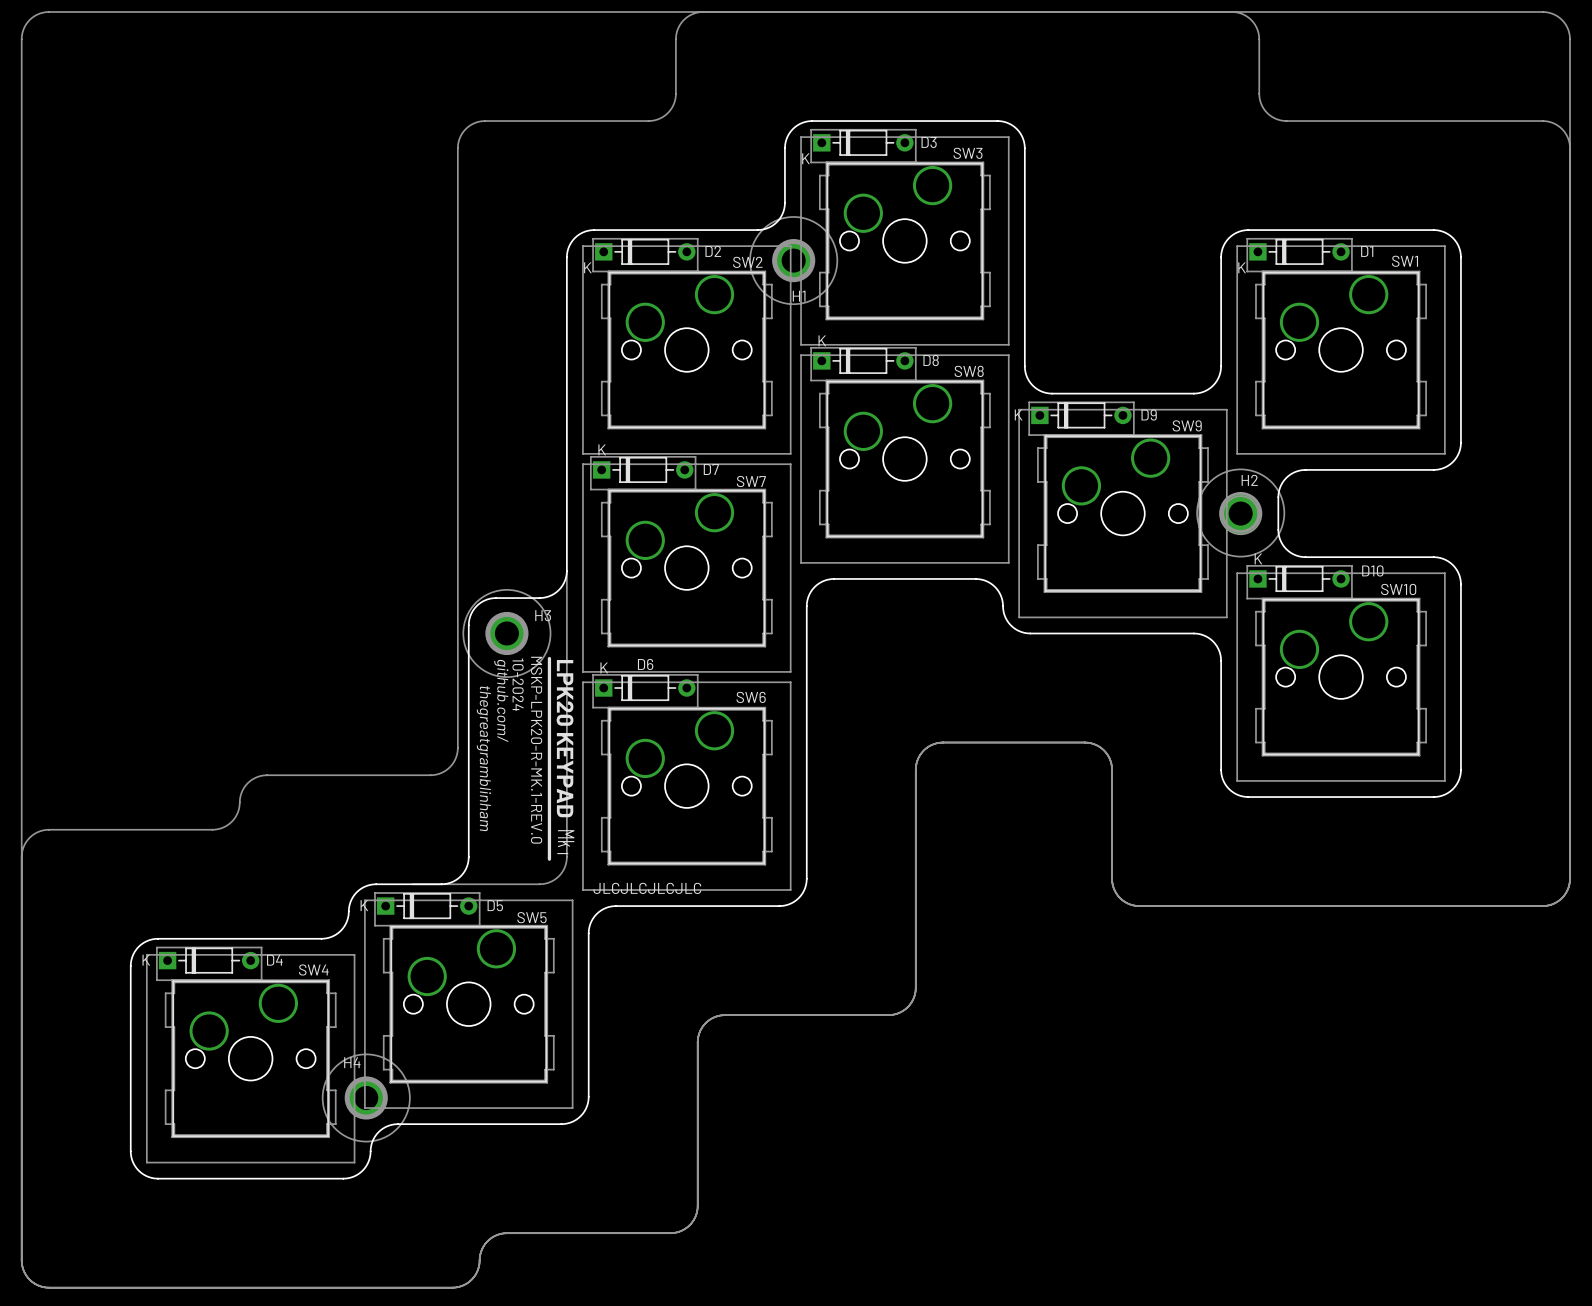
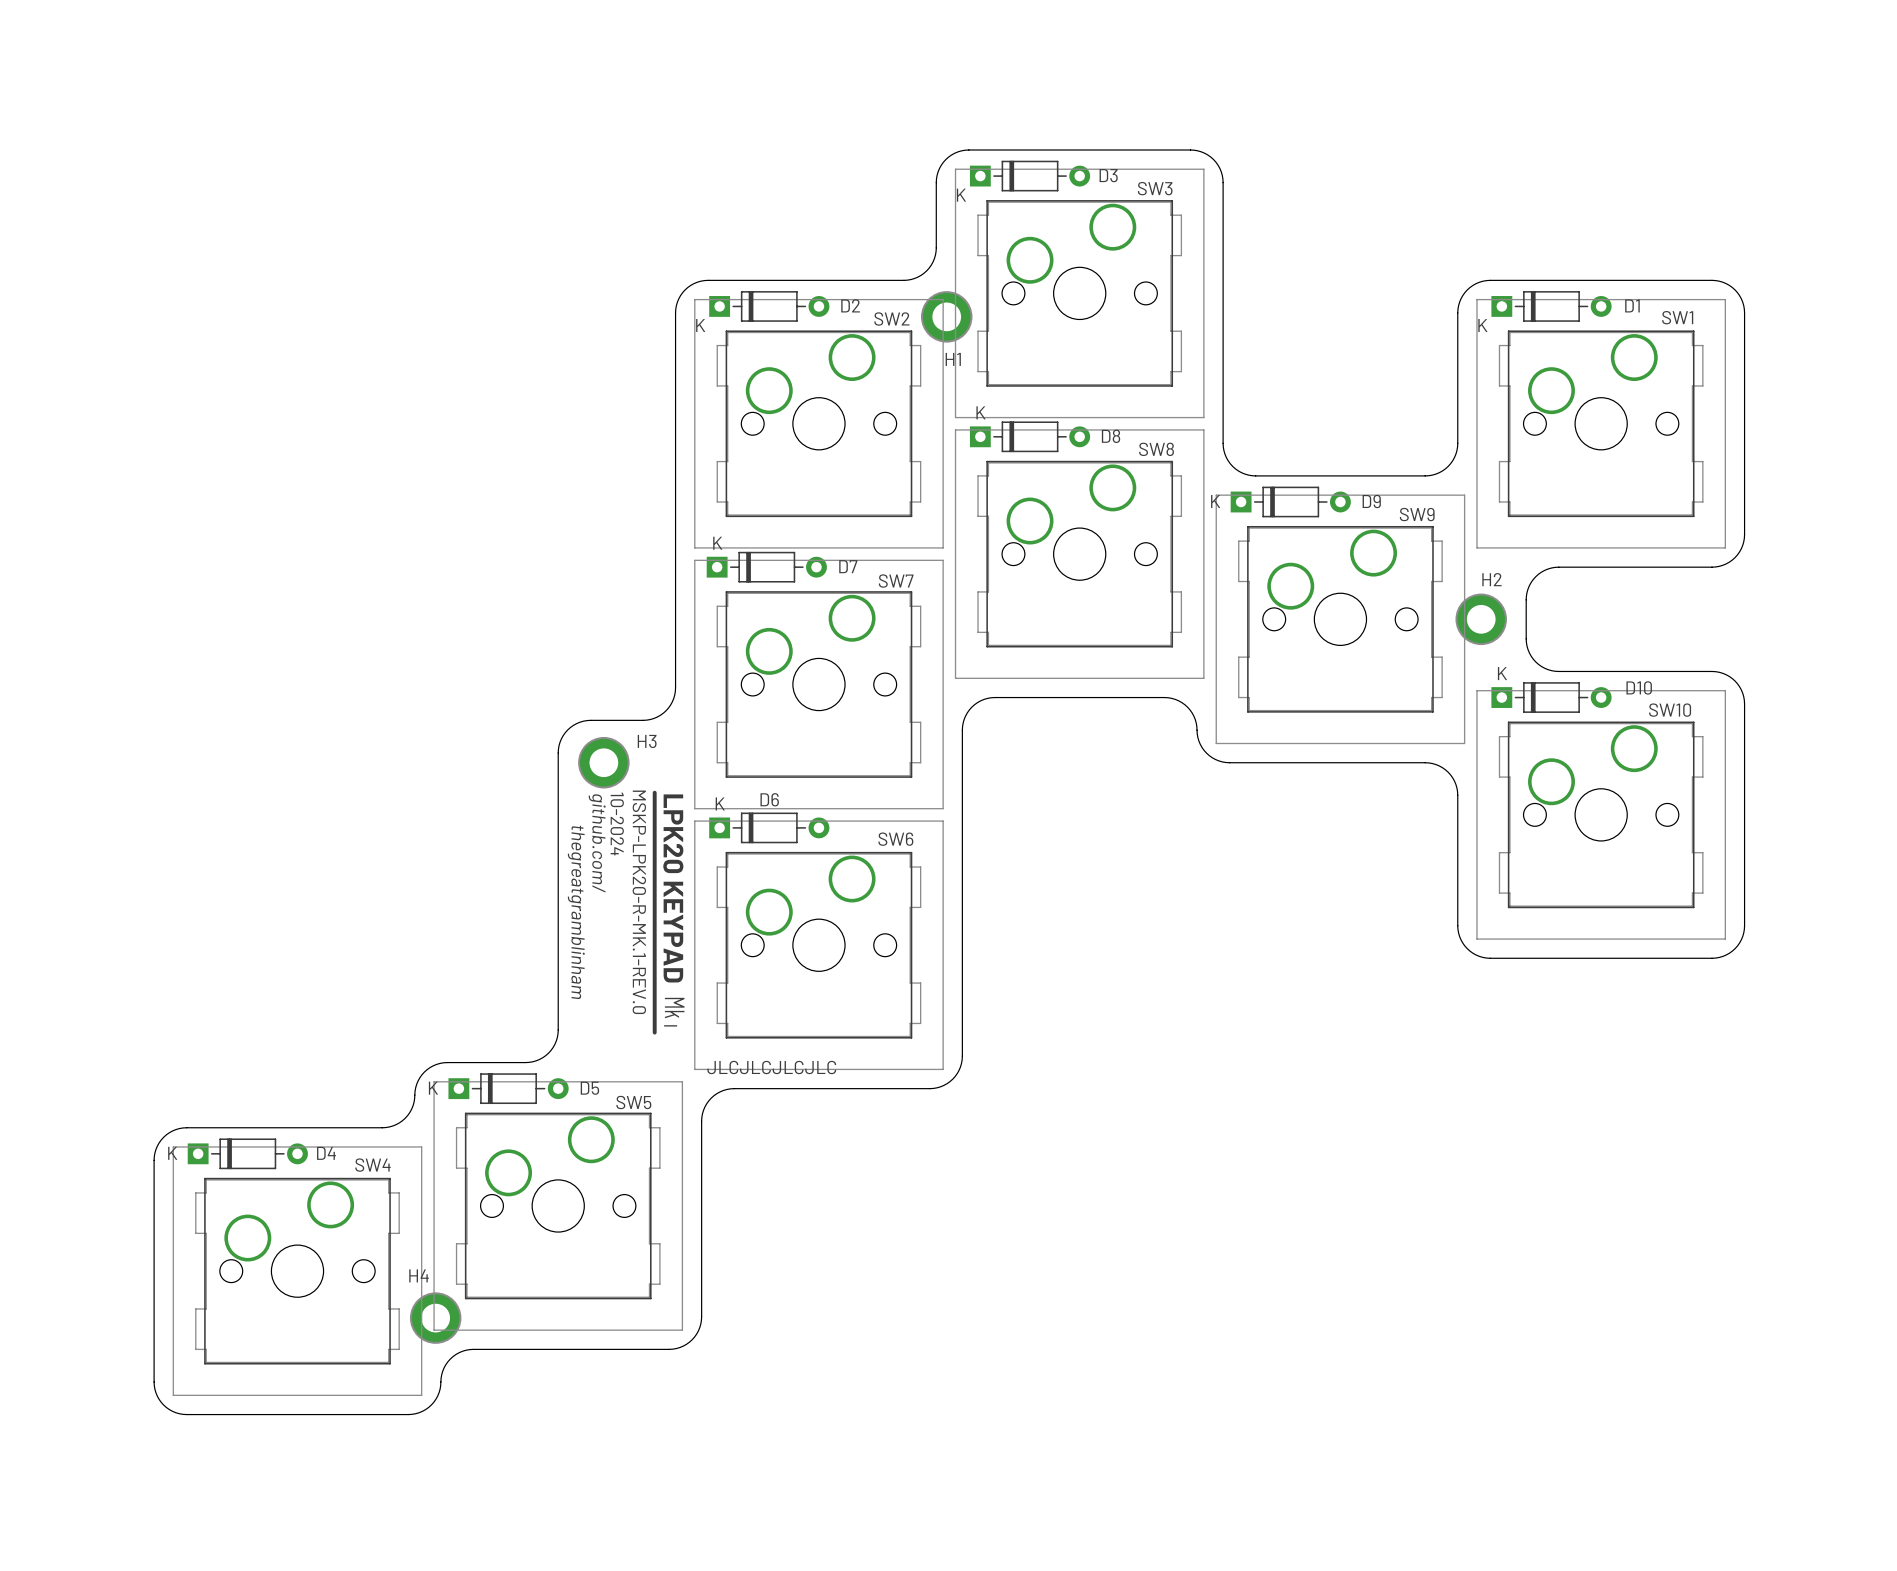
line: (703, 11) (694, 13) (686, 17) (677, 30) (675, 99) (669, 110) (660, 118) (648, 121) (482, 121) (468, 126) (459, 139) (457, 148) (457, 747) (456, 756) (451, 764) (445, 771) (433, 775) (260, 775) (252, 779) (245, 785) (241, 793) (235, 816) (229, 823) (221, 828) (45, 829) (37, 832) (29, 837) (23, 848) (21, 857) -> none
line: (1231, 11) (1246, 16) (1256, 27) (1259, 39) (1259, 99) (1267, 113) (1277, 119) (1545, 121) (1554, 123) (1562, 129) (1568, 139) (1570, 148) -> none
line: (826, 162) (826, 319) (983, 319) (983, 162) (811, 162) (811, 129) (915, 129) (915, 162) -> none
drawing: [749, 216, 838, 305] -> none
line: (608, 271) (608, 428) (765, 428) (765, 271) (593, 271) (593, 238) (697, 238) (697, 271) -> none
line: (1262, 271) (1262, 428) (1419, 428) (1419, 271) (1247, 271) (1247, 238) (1351, 238) (1351, 271) -> none
line: (826, 380) (826, 537) (983, 537) (983, 380) (811, 380) (811, 347) (915, 347) (915, 380) -> none
line: (1044, 435) (1044, 592) (1201, 592) (1201, 435) (1029, 435) (1029, 402) (1133, 402) (1133, 435) -> none
drawing: [1196, 468, 1285, 558] -> none
line: (608, 489) (608, 646) (765, 646) (765, 489) (590, 489) (590, 456) (695, 456) (695, 489) -> none
line: (566, 570) (566, 857) (564, 868) (556, 878) (542, 884) (412, 884) -> none
drawing: [462, 589, 552, 678] -> none
line: (1262, 598) (1262, 755) (1419, 755) (1419, 598) (1247, 598) (1247, 565) (1351, 565) (1351, 598) -> none
line: (608, 707) (608, 864) (765, 864) (765, 707) (593, 707) (593, 674) (697, 674) (697, 707) -> none
line: (943, 742) (1084, 742) -> none
line: (943, 742) (934, 744) (923, 750) (917, 760) (915, 769) -> none
line: (943, 742) (934, 744) (923, 750) (917, 760) (915, 769) -> none
line: (1084, 742) (1093, 744) (1104, 750) (1110, 760) (1112, 769) -> none
line: (1084, 742) (1093, 744) (1104, 750) (1110, 760) (1112, 769) -> none
line: (915, 769) (915, 987) -> none
line: (1112, 769) (1112, 878) -> none
line: (1112, 878) (1113, 887) (1120, 898) (1130, 904) (1139, 906) -> none
line: (1112, 878) (1113, 887) (1120, 898) (1130, 904) (1139, 906) -> none
line: (1570, 878) (1570, 39) (1565, 24) (1557, 16) (1542, 11) (42, 12) (34, 16) (27, 22) (23, 30) (21, 39) (21, 1260) -> none
line: (1570, 878) (1568, 887) (1562, 898) (1551, 904) (1542, 906) -> none
line: (1570, 878) (1568, 887) (1562, 898) (1551, 904) (1542, 906) -> none
line: (1139, 906) (1542, 906) -> none
line: (390, 925) (390, 1082) (547, 1082) (547, 925) (374, 925) (374, 892) (479, 892) (479, 925) -> none
line: (172, 980) (172, 1137) (329, 1137) (329, 980) (156, 980) (156, 947) (261, 947) (261, 980) -> none
line: (915, 987) (914, 996) (907, 1007) (897, 1013) (888, 1015) -> none
line: (915, 987) (914, 996) (907, 1007) (897, 1013) (888, 1015) -> none
line: (724, 1015) (888, 1015) -> none
line: (724, 1015) (715, 1016) (705, 1023) (699, 1033) (697, 1042) -> none
line: (724, 1015) (715, 1016) (705, 1023) (699, 1033) (697, 1042) -> none
line: (697, 1042) (697, 1205) -> none
drawing: [322, 1053, 411, 1143] -> none
line: (697, 1205) (696, 1214) (689, 1225) (679, 1231) (670, 1233) -> none
line: (697, 1205) (696, 1214) (689, 1225) (679, 1231) (670, 1233) -> none
line: (506, 1233) (670, 1233) -> none
line: (506, 1233) (497, 1234) (487, 1241) (481, 1251) (479, 1260) -> none
line: (506, 1233) (497, 1234) (487, 1241) (481, 1251) (479, 1260) -> none
line: (21, 1260) (23, 1269) (29, 1279) (39, 1286) (48, 1287) -> none
line: (21, 1260) (23, 1269) (29, 1279) (39, 1286) (48, 1287) -> none
line: (479, 1260) (478, 1269) (471, 1279) (461, 1286) (452, 1287) -> none
line: (479, 1260) (478, 1269) (471, 1279) (461, 1286) (452, 1287) -> none
line: (48, 1287) (452, 1287) -> none

